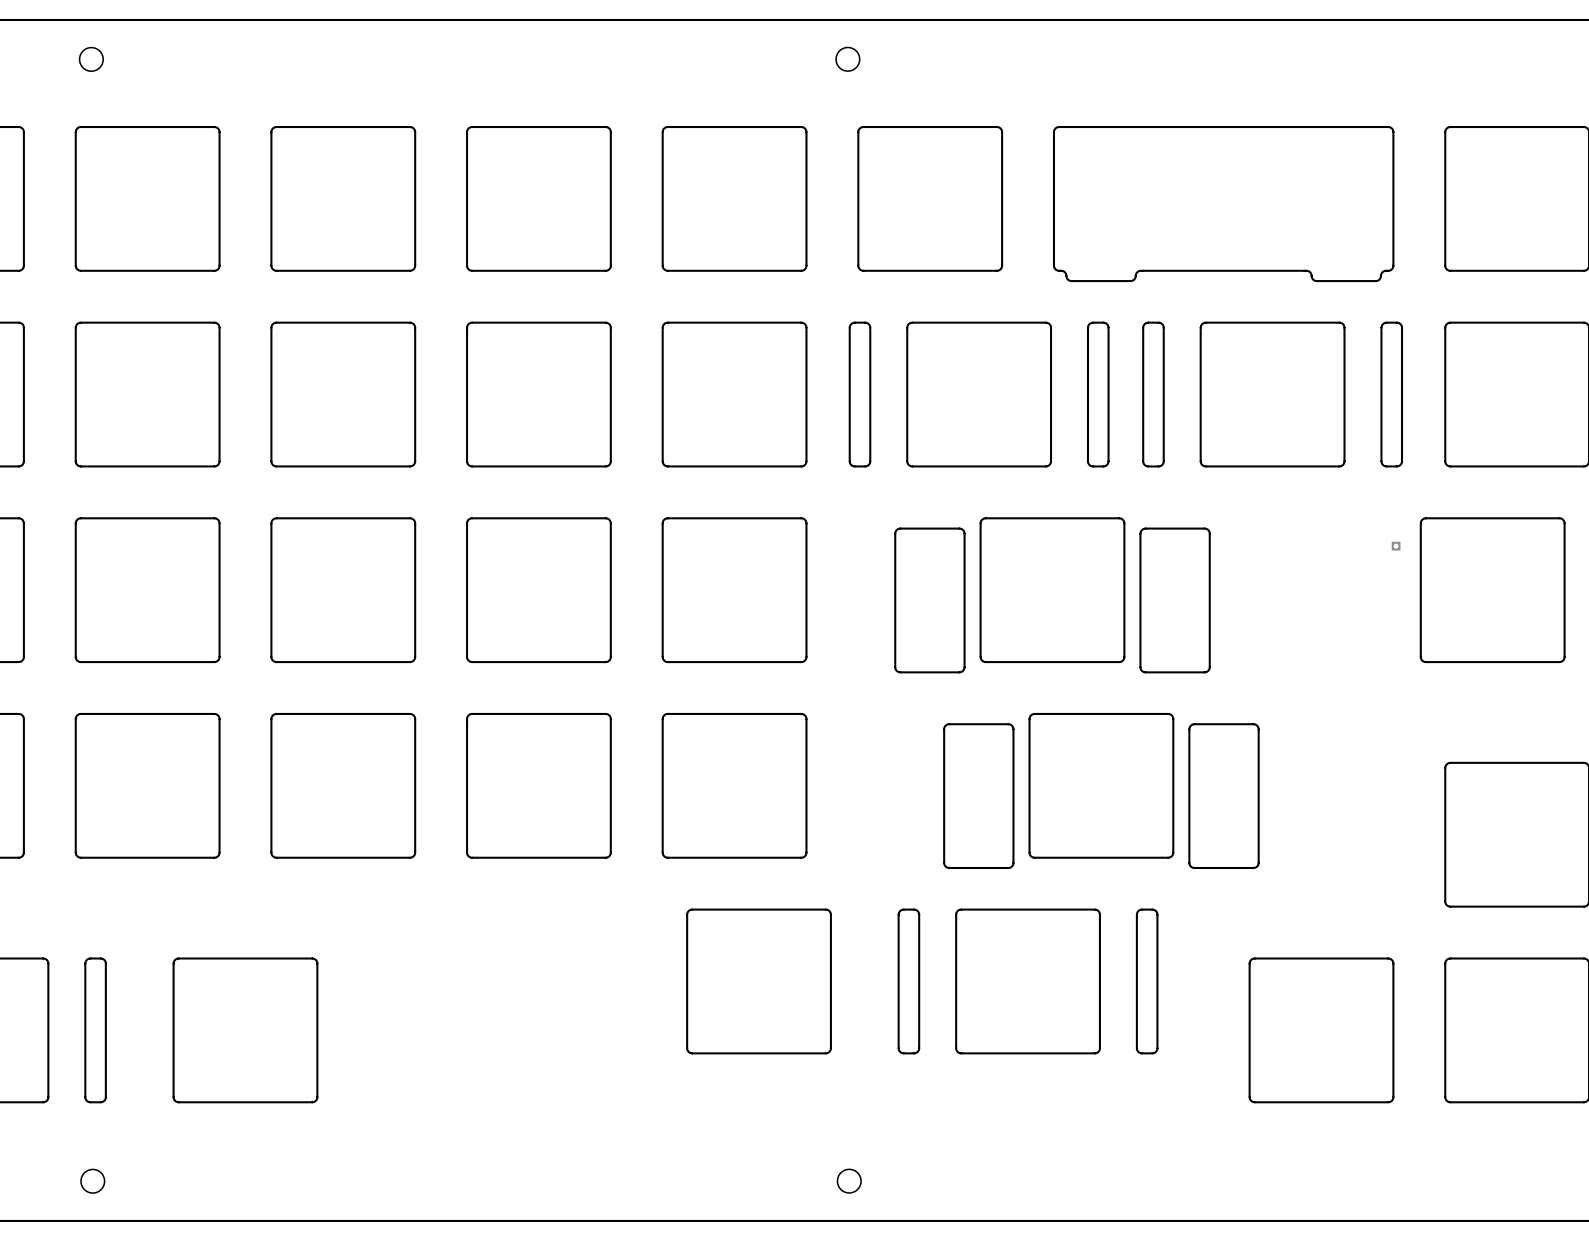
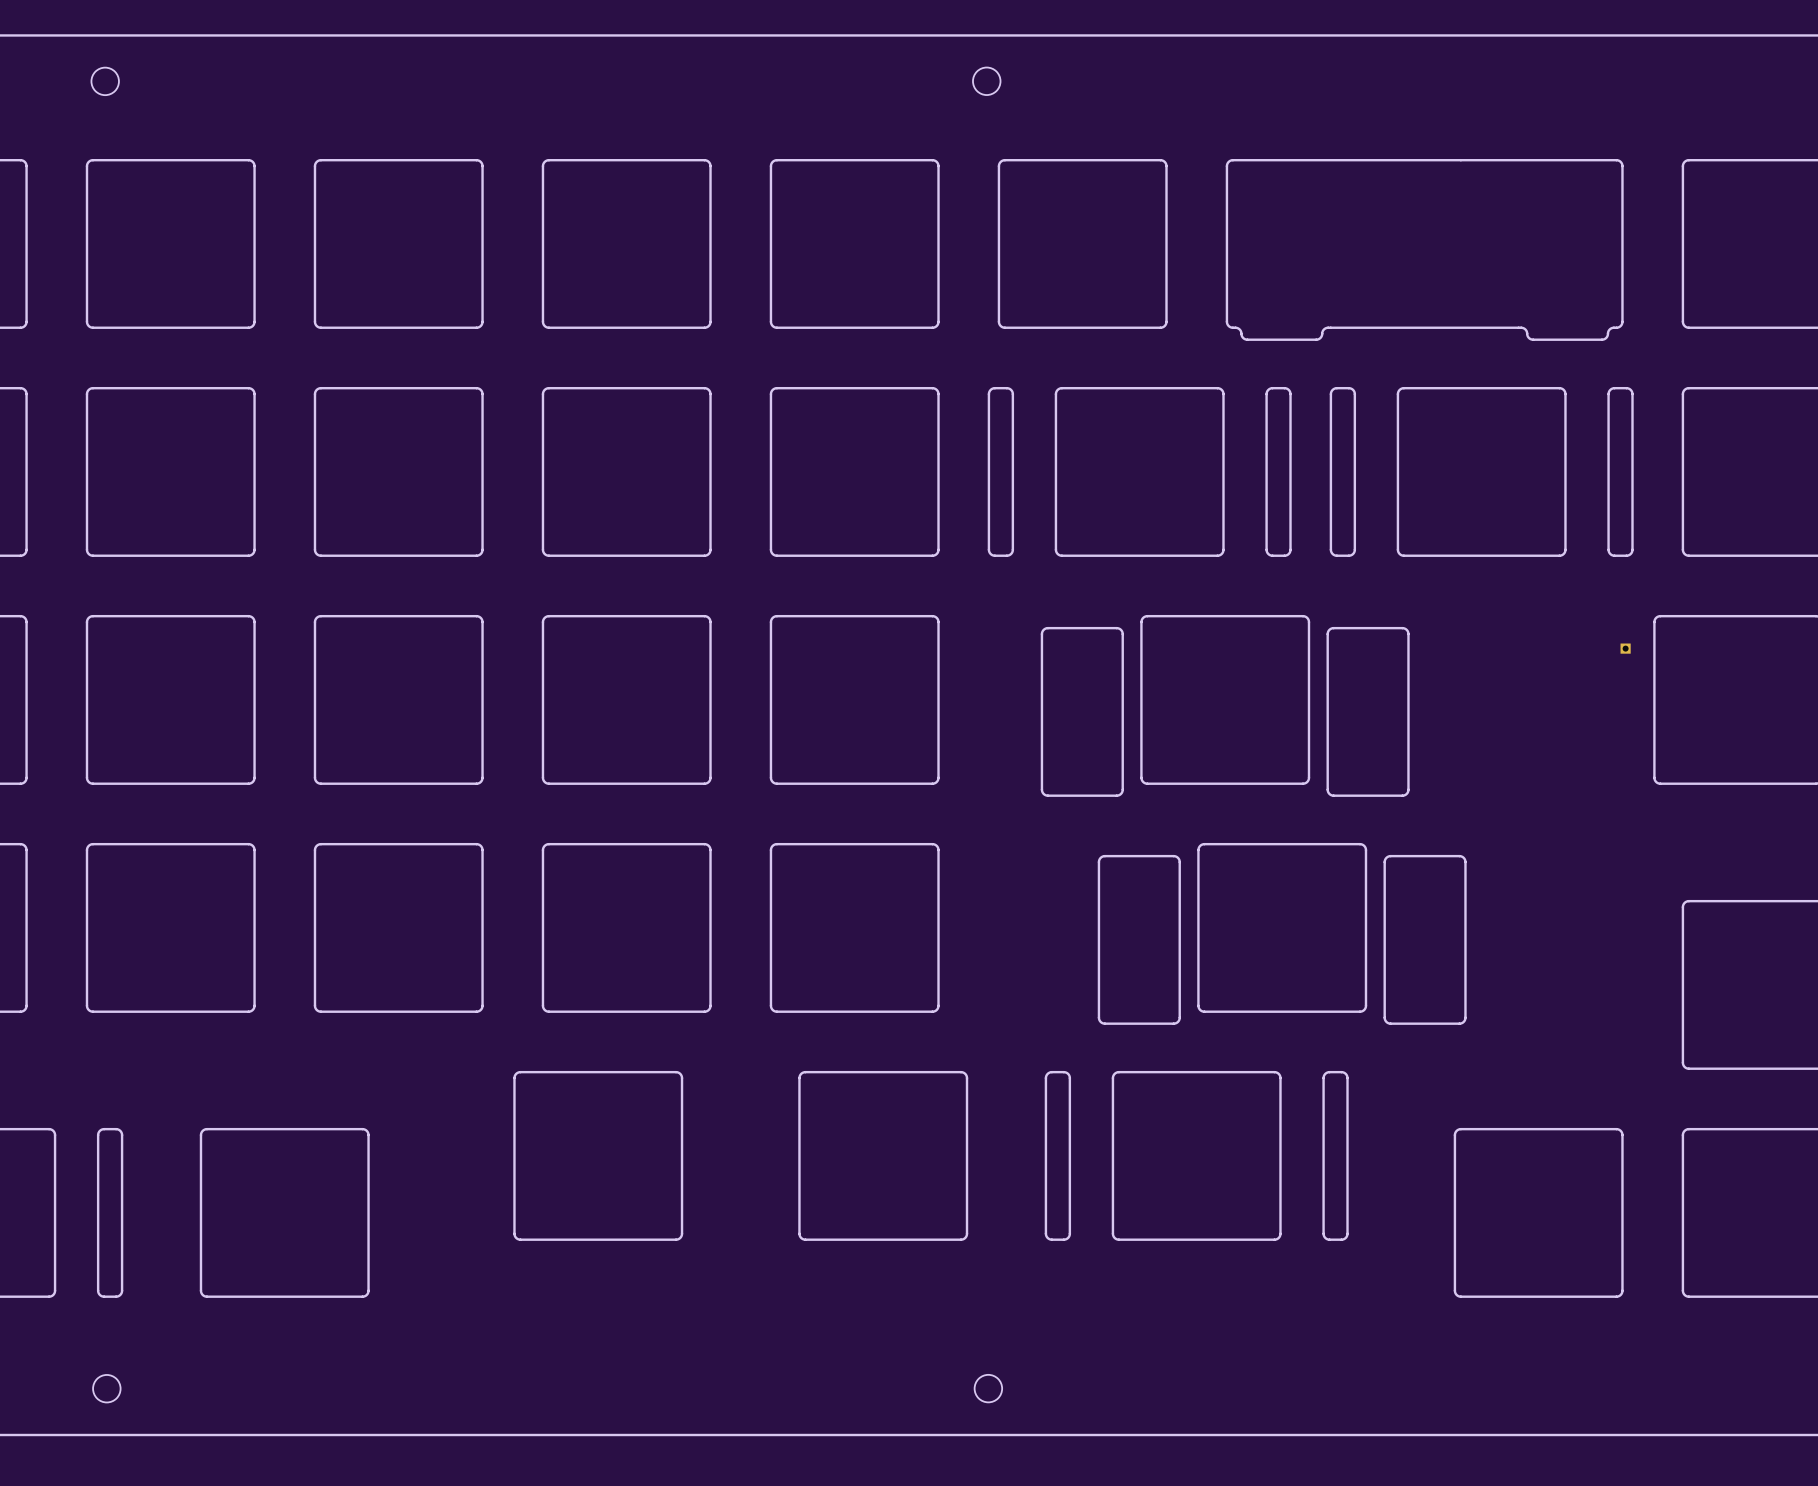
board edge: none -> (676, 1072) (520, 1072) (516, 1073) (514, 1078) (514, 1233) (516, 1237) (520, 1239) (676, 1239) (680, 1237) (682, 1233) (682, 1078) (680, 1073) (676, 1072)

